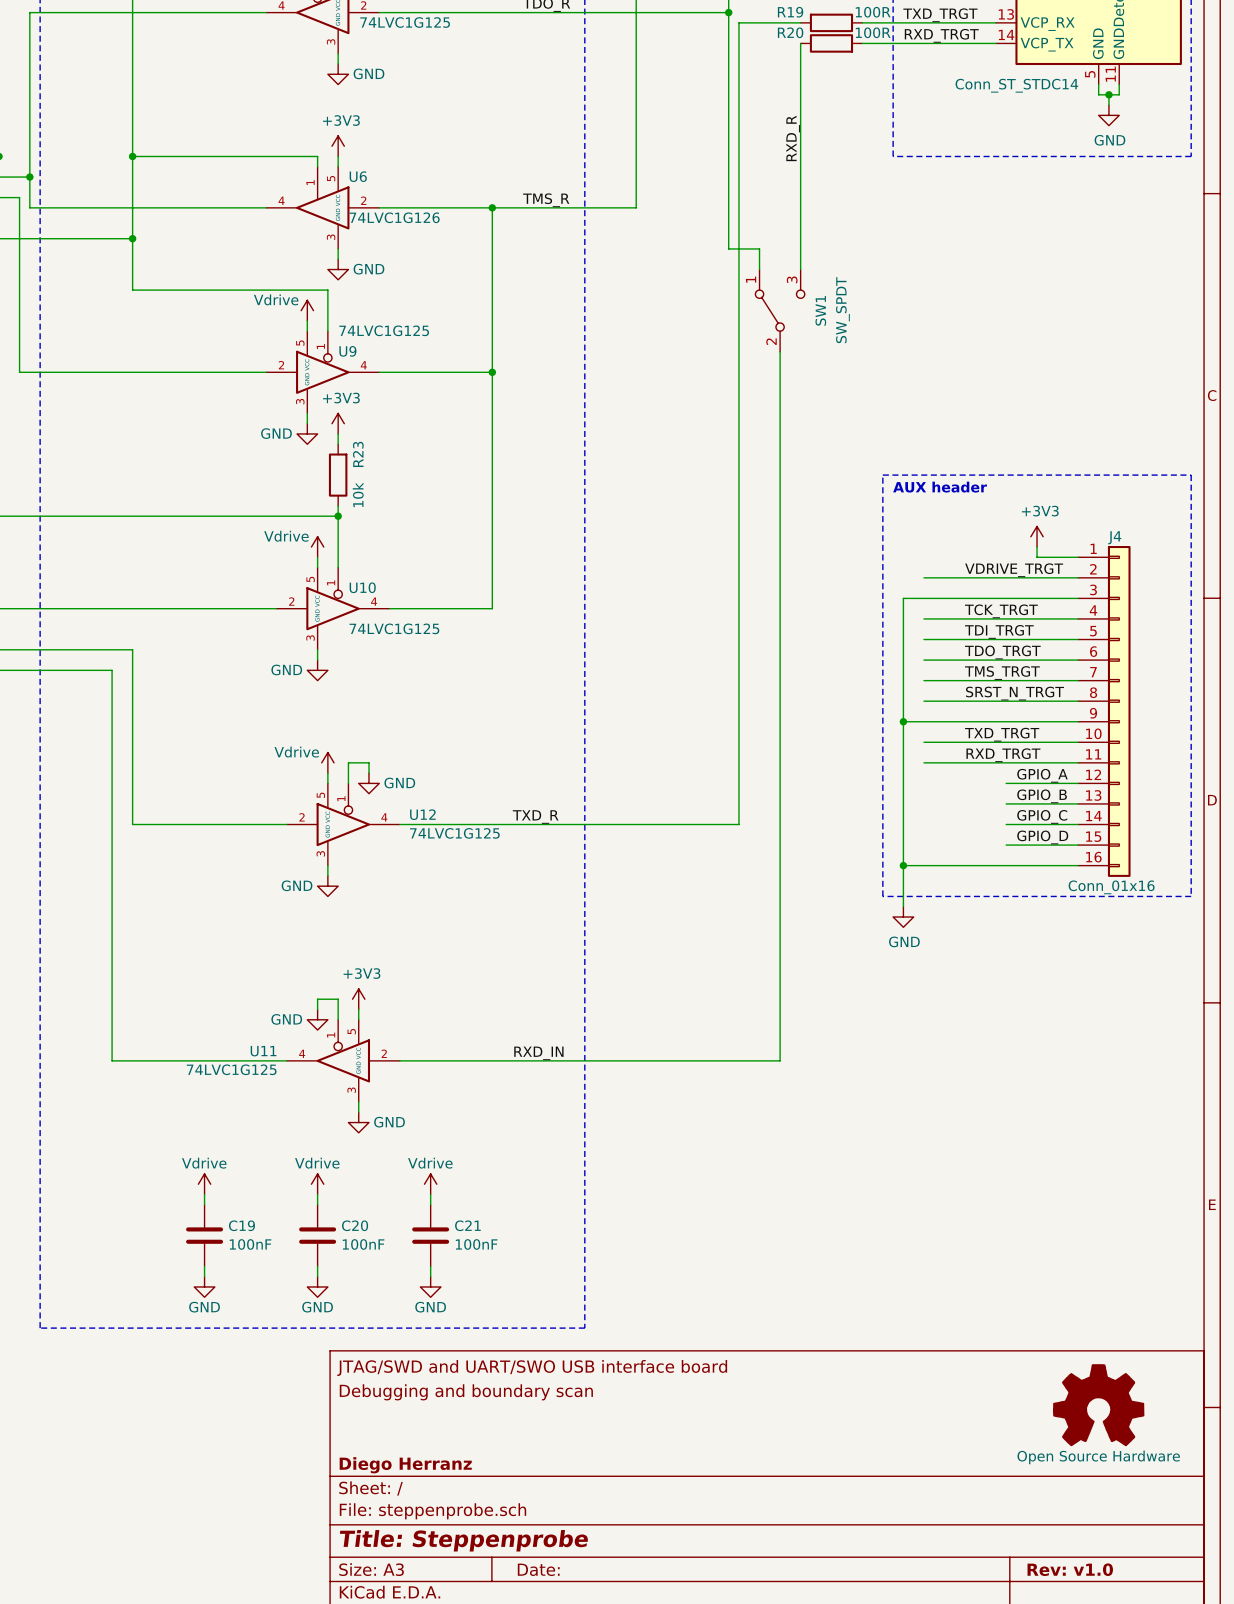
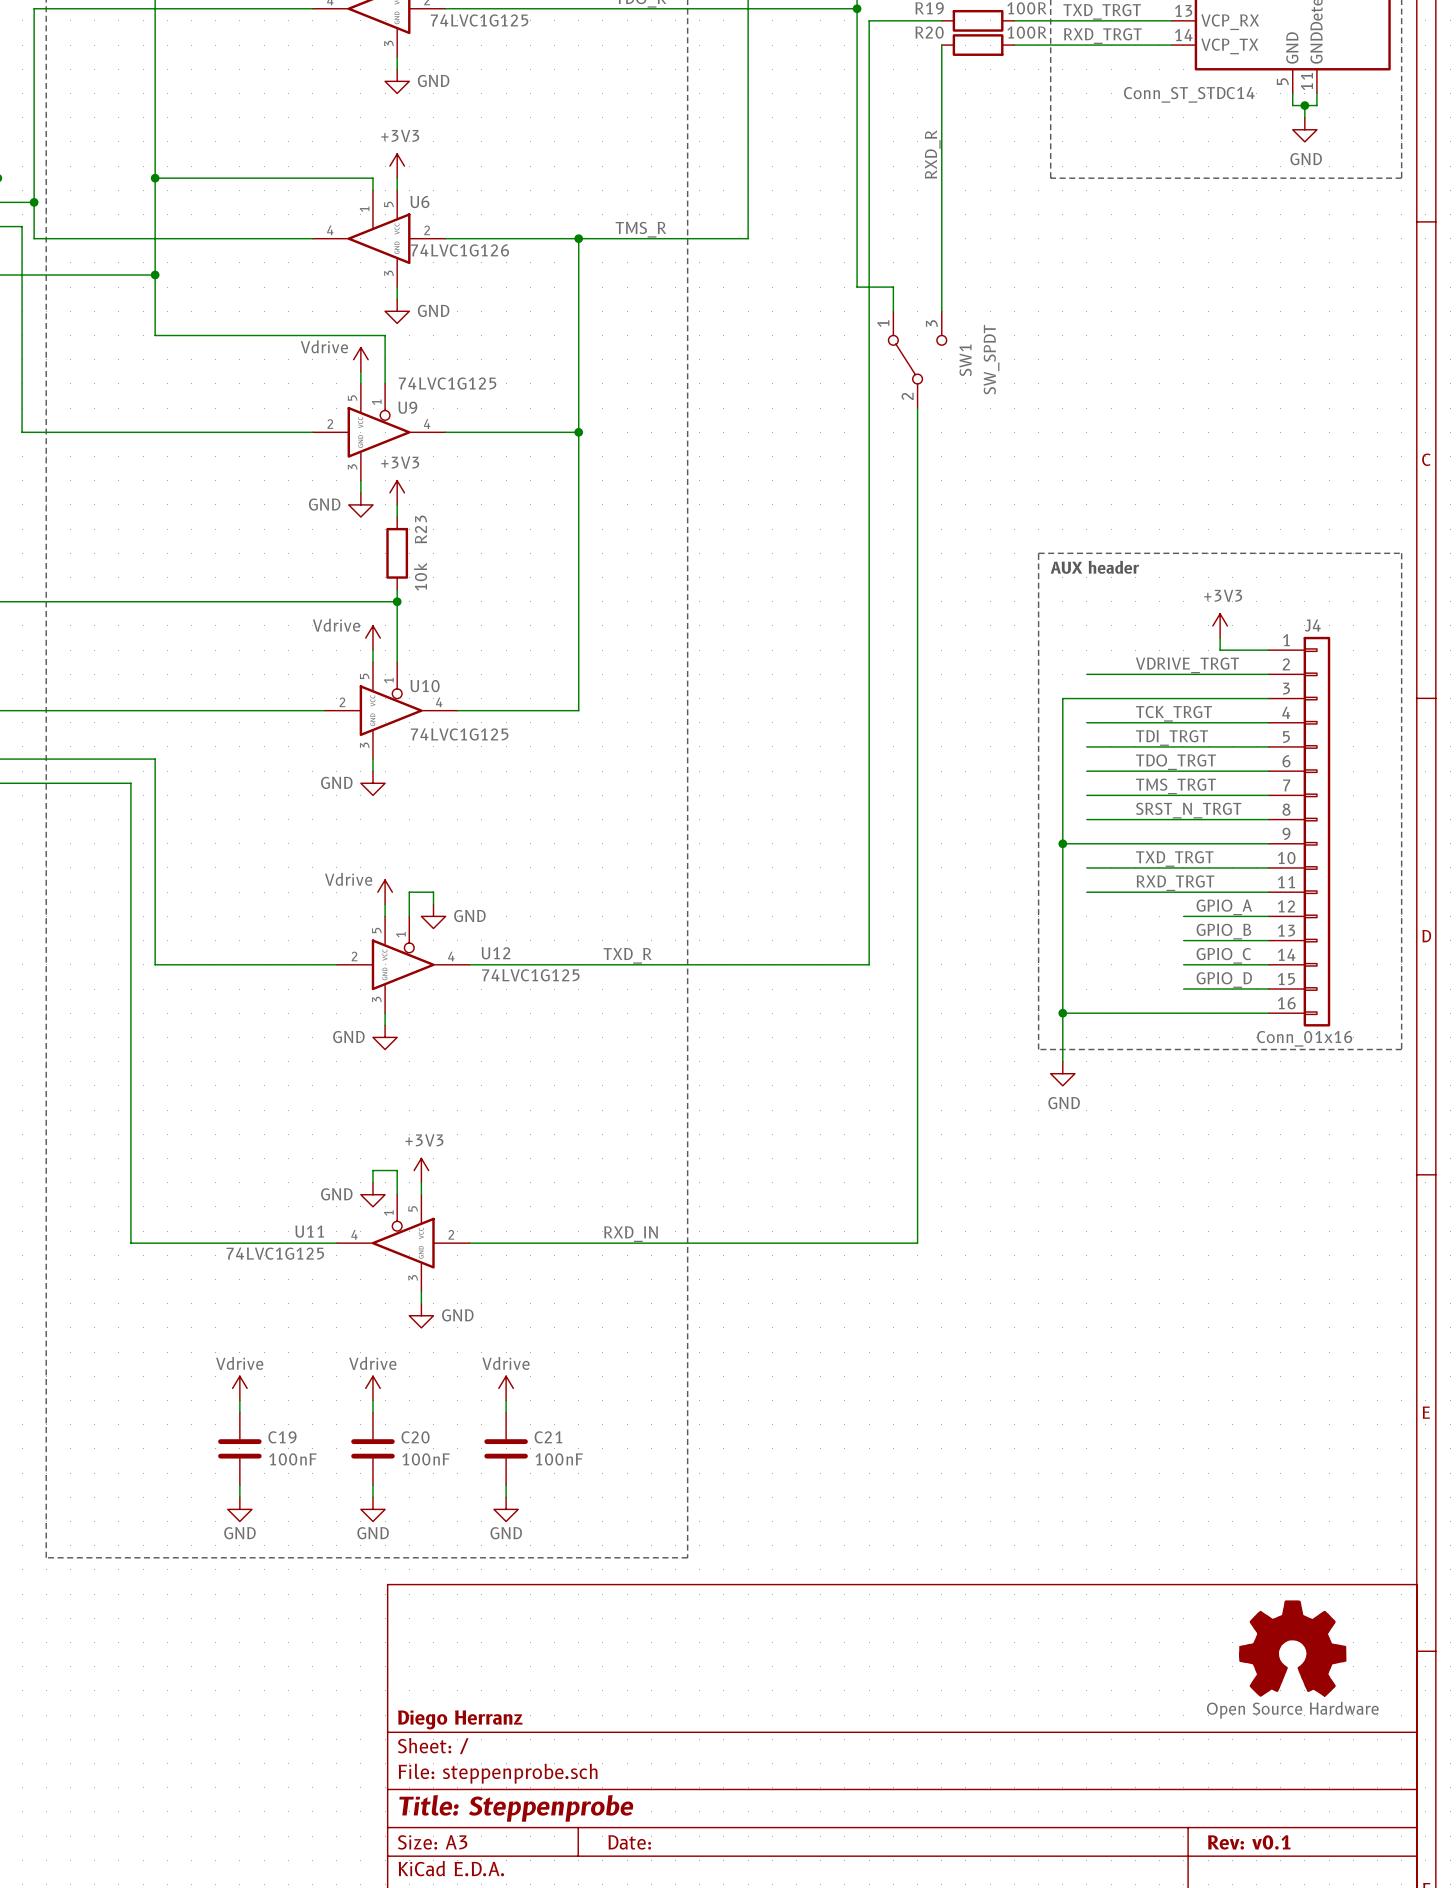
title block: JTAG/SWD and UART/SWO USB interface board (532, 1367) -> none
title block: Debugging and boundary scan (466, 1392) -> none
title block: Rev: v1.0 (1070, 1569) -> Rev: v0.1 (1249, 1842)

